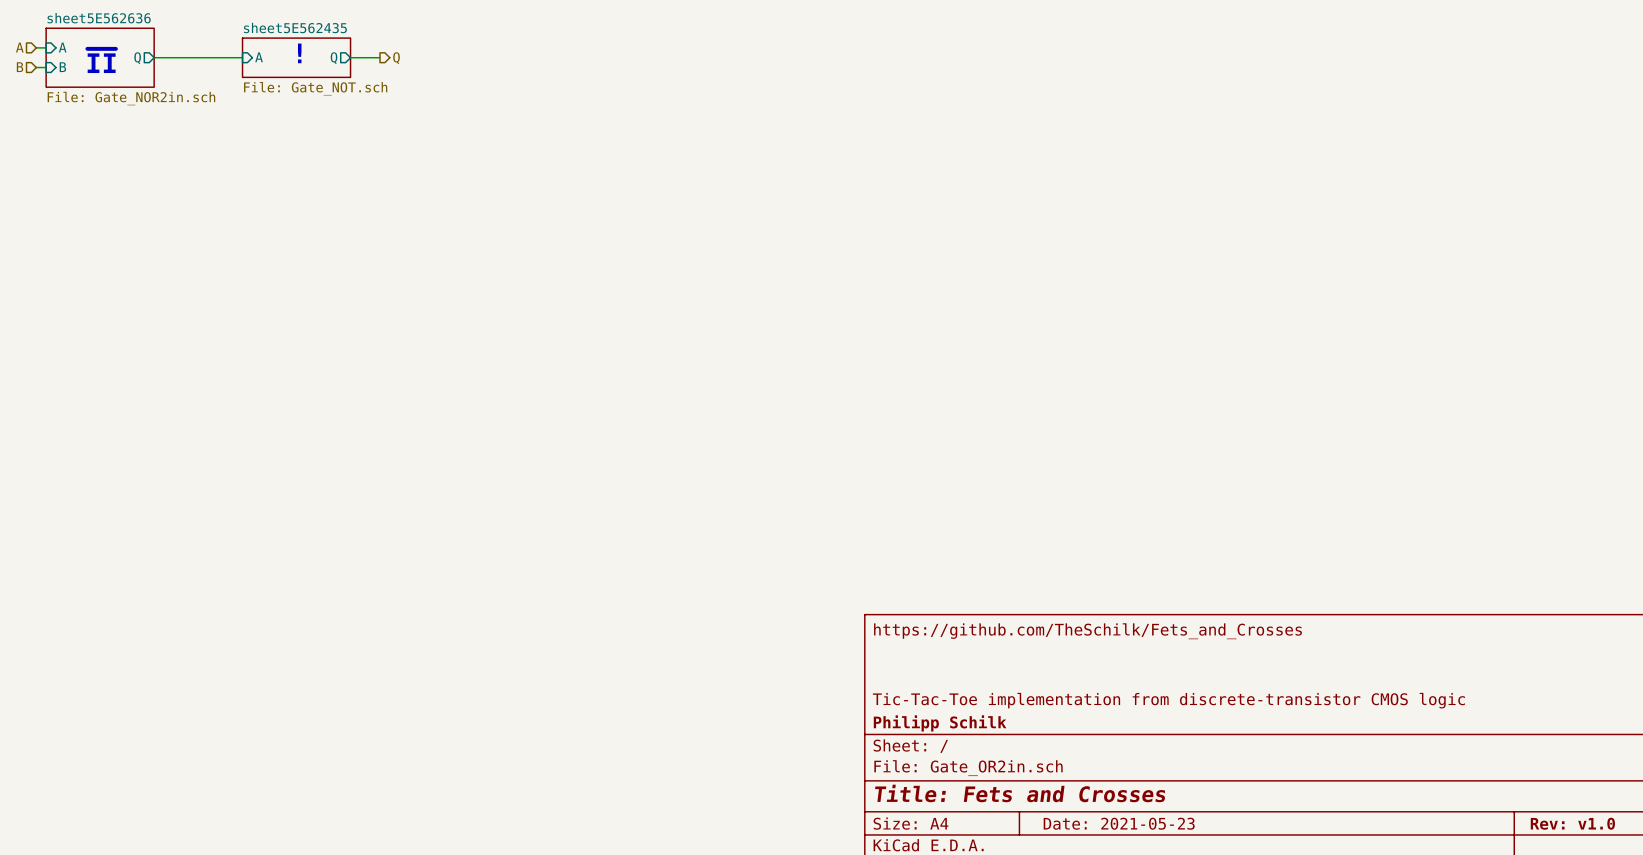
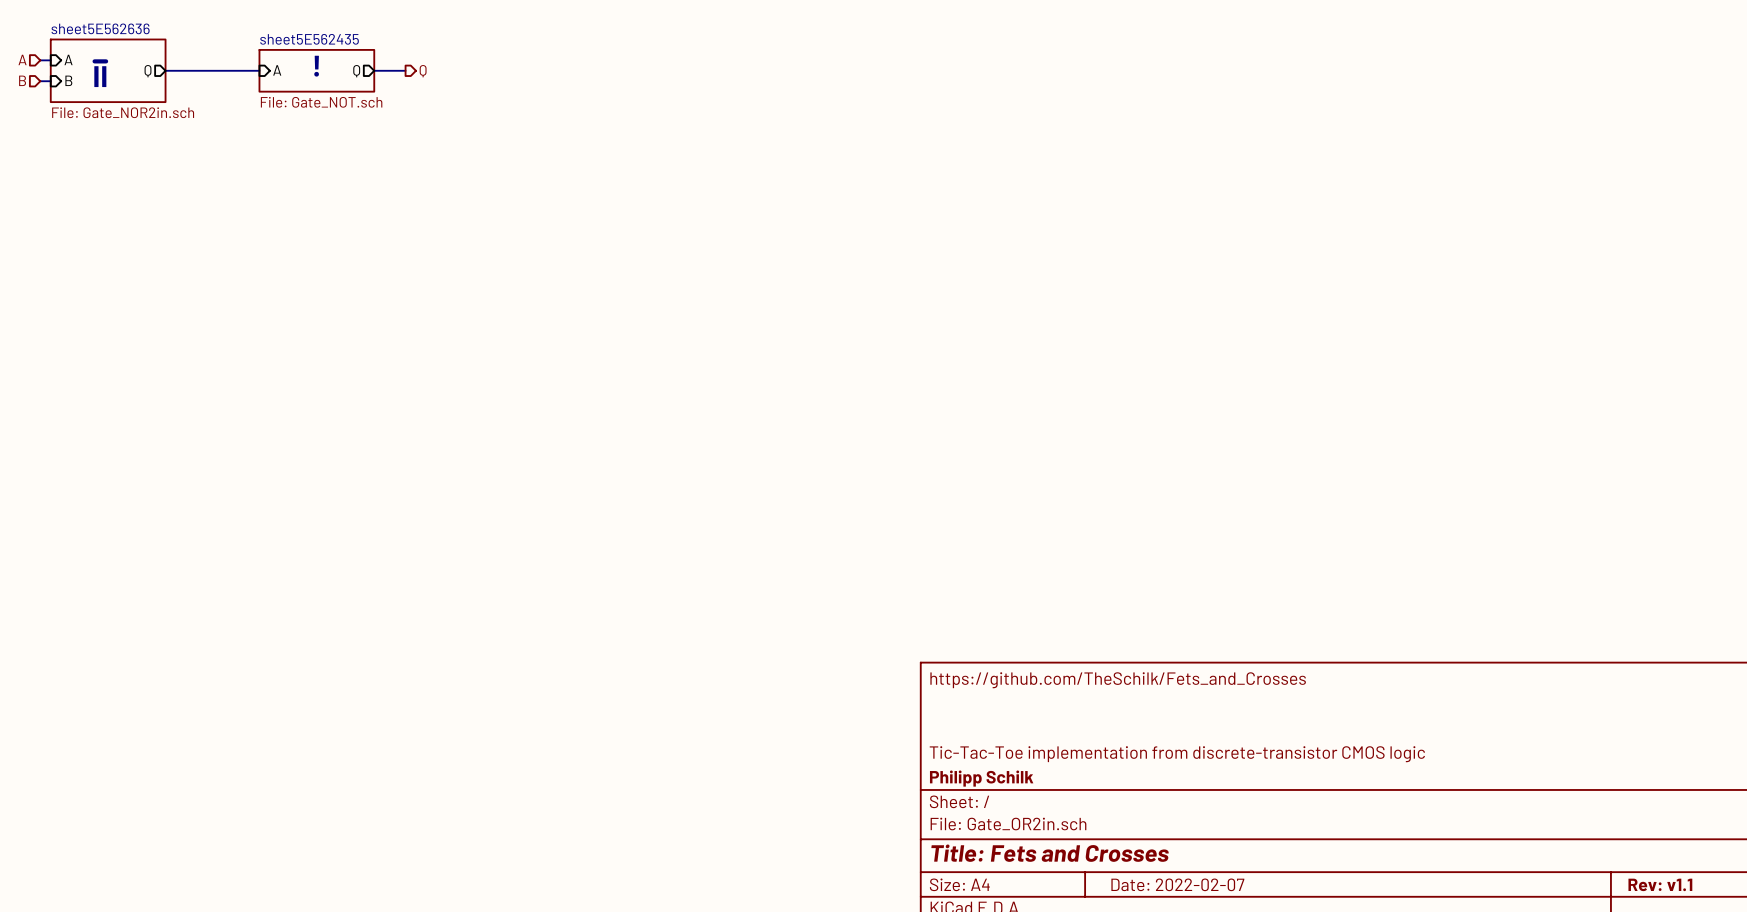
title block: Date: 2021-05-23 (1119, 823) -> Date: 2022-02-07 (1177, 884)
title block: Rev: v1.0 (1572, 823) -> Rev: v1.1 (1660, 884)

